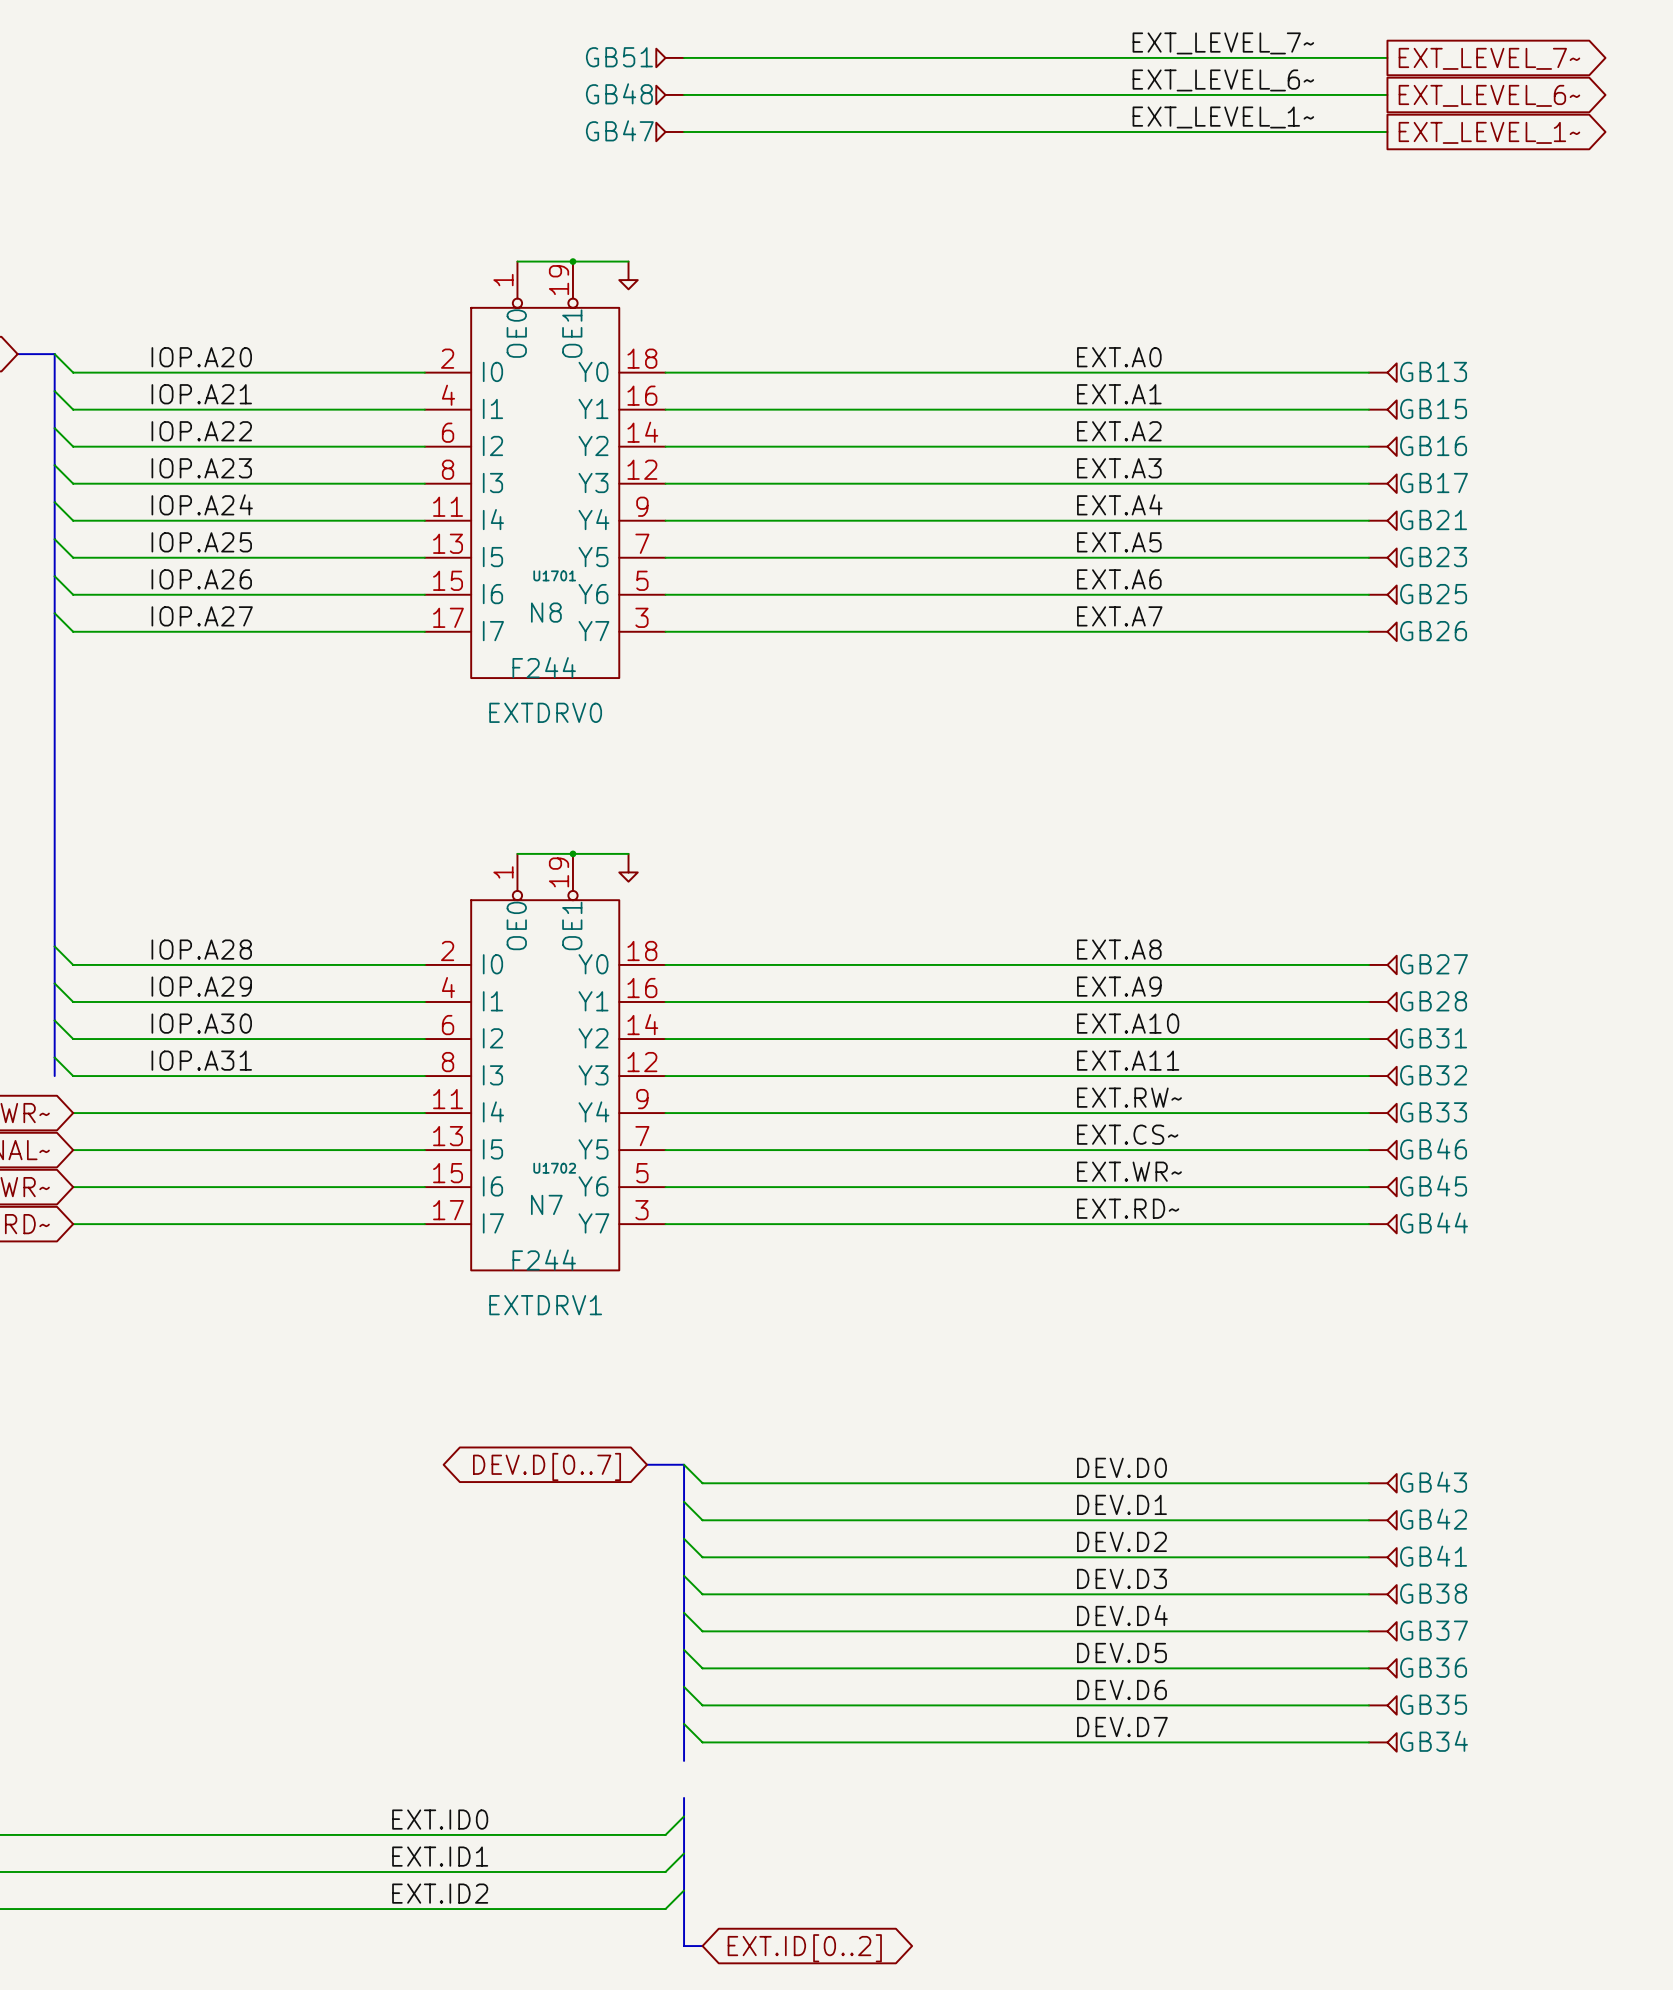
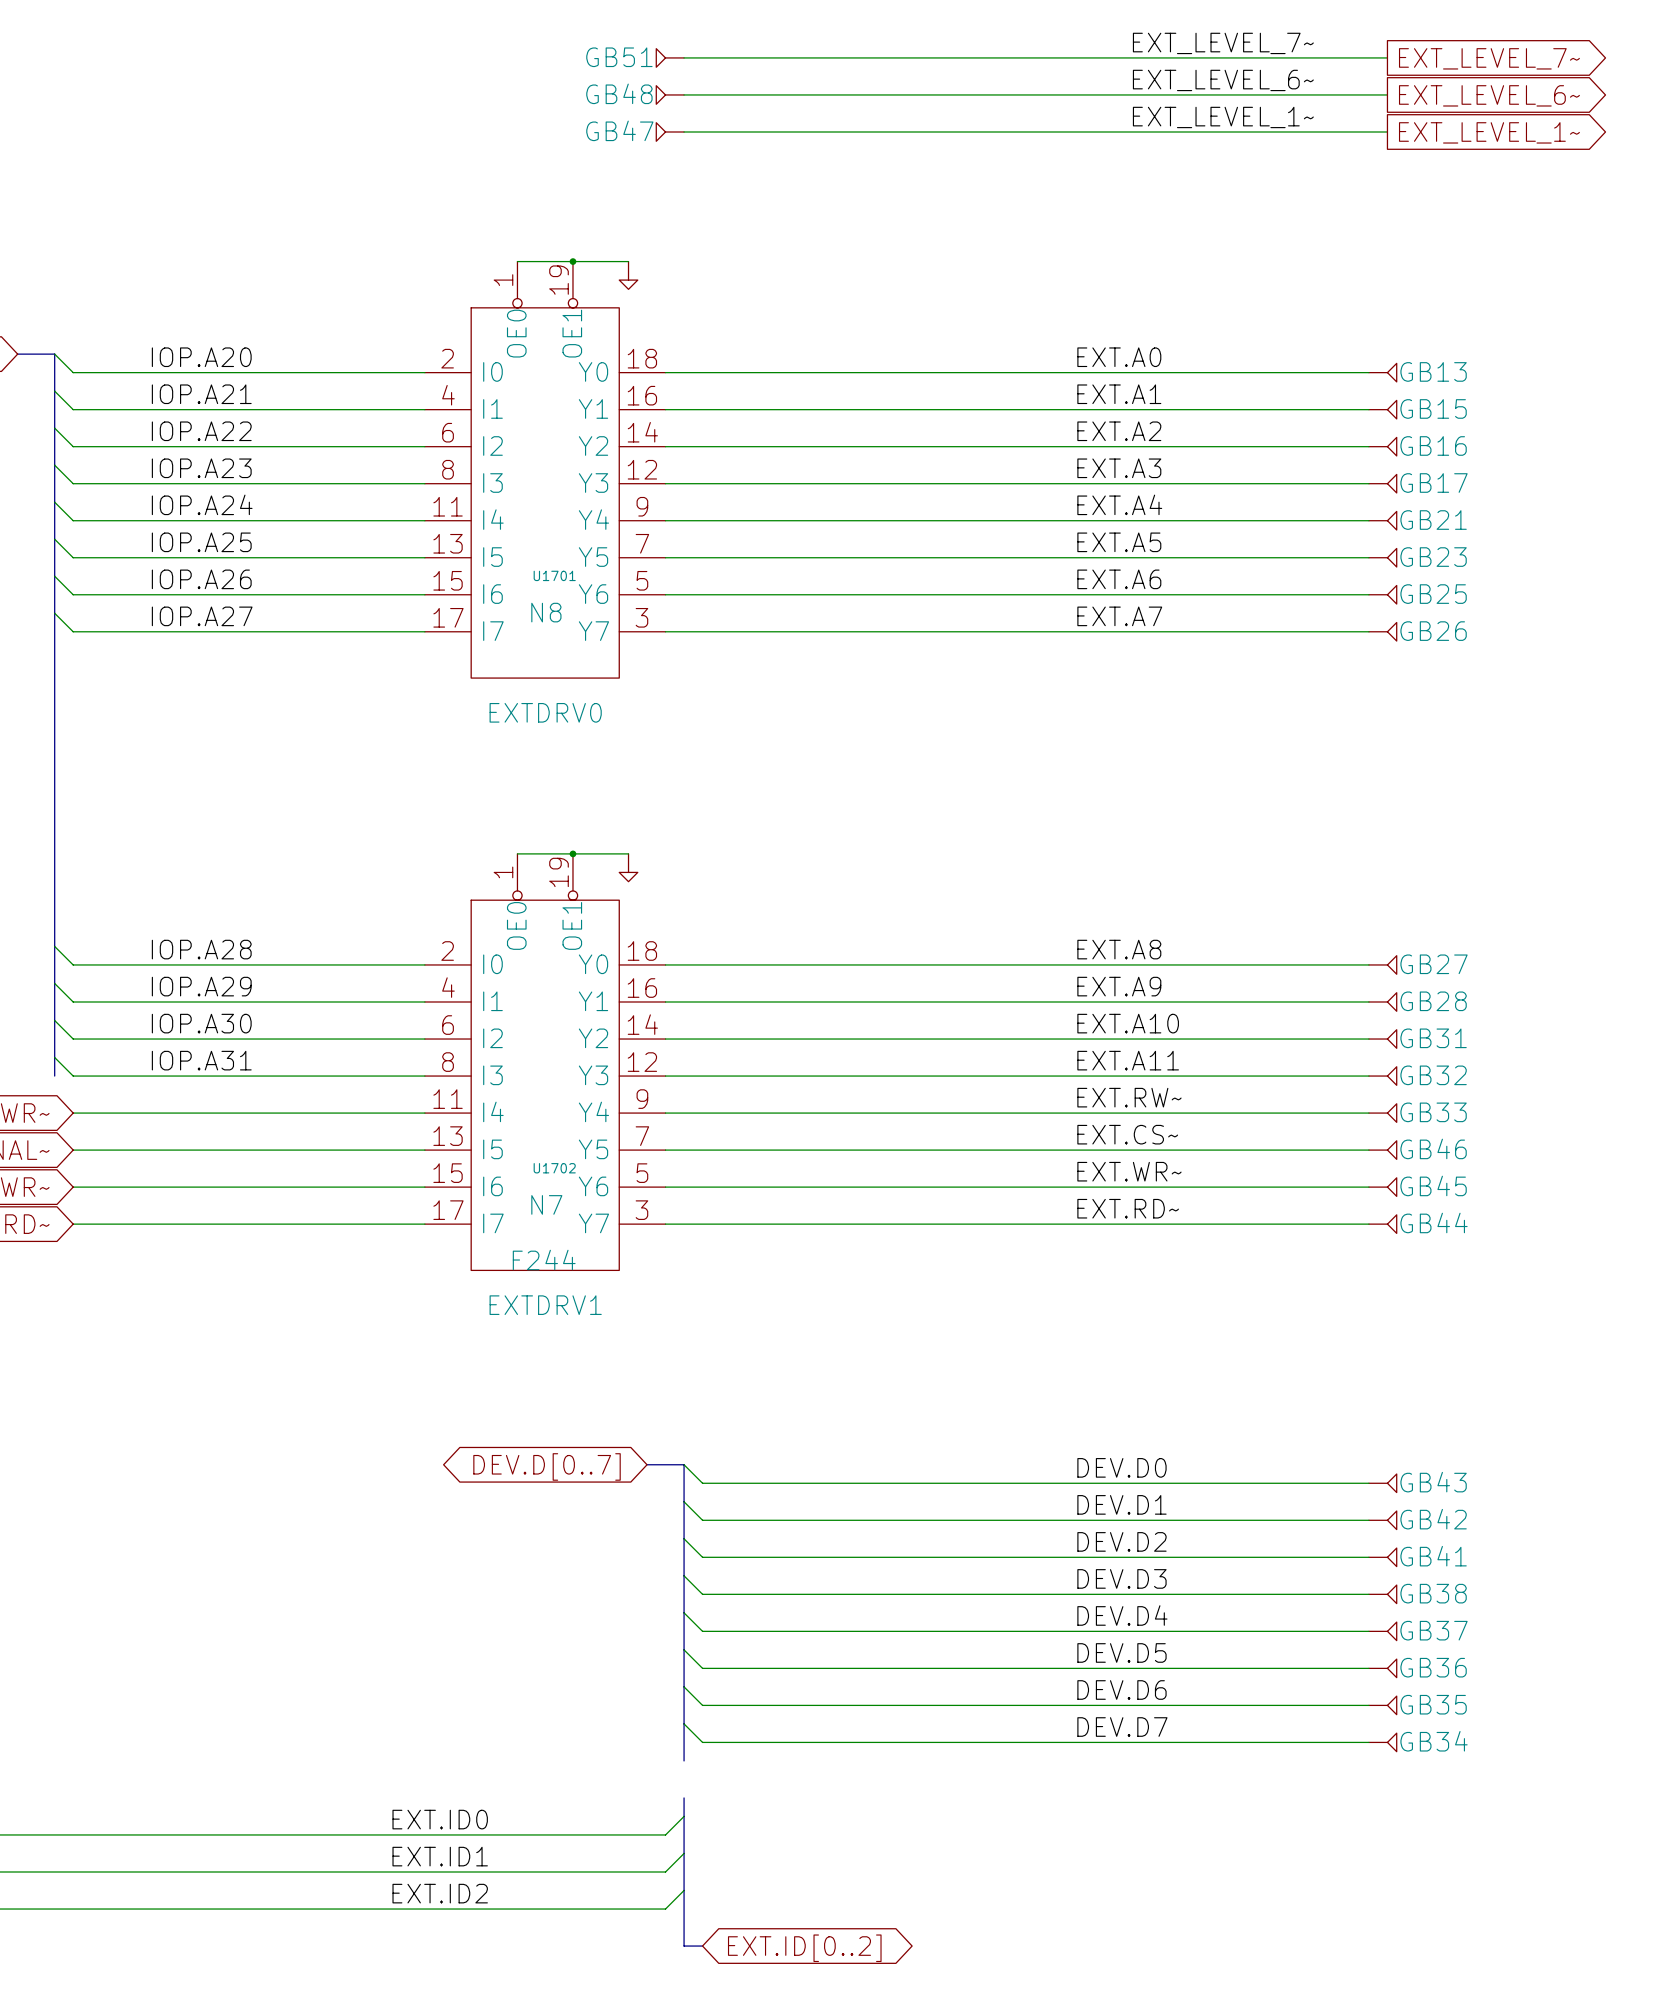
U1701 value: F244 (544, 667) -> none

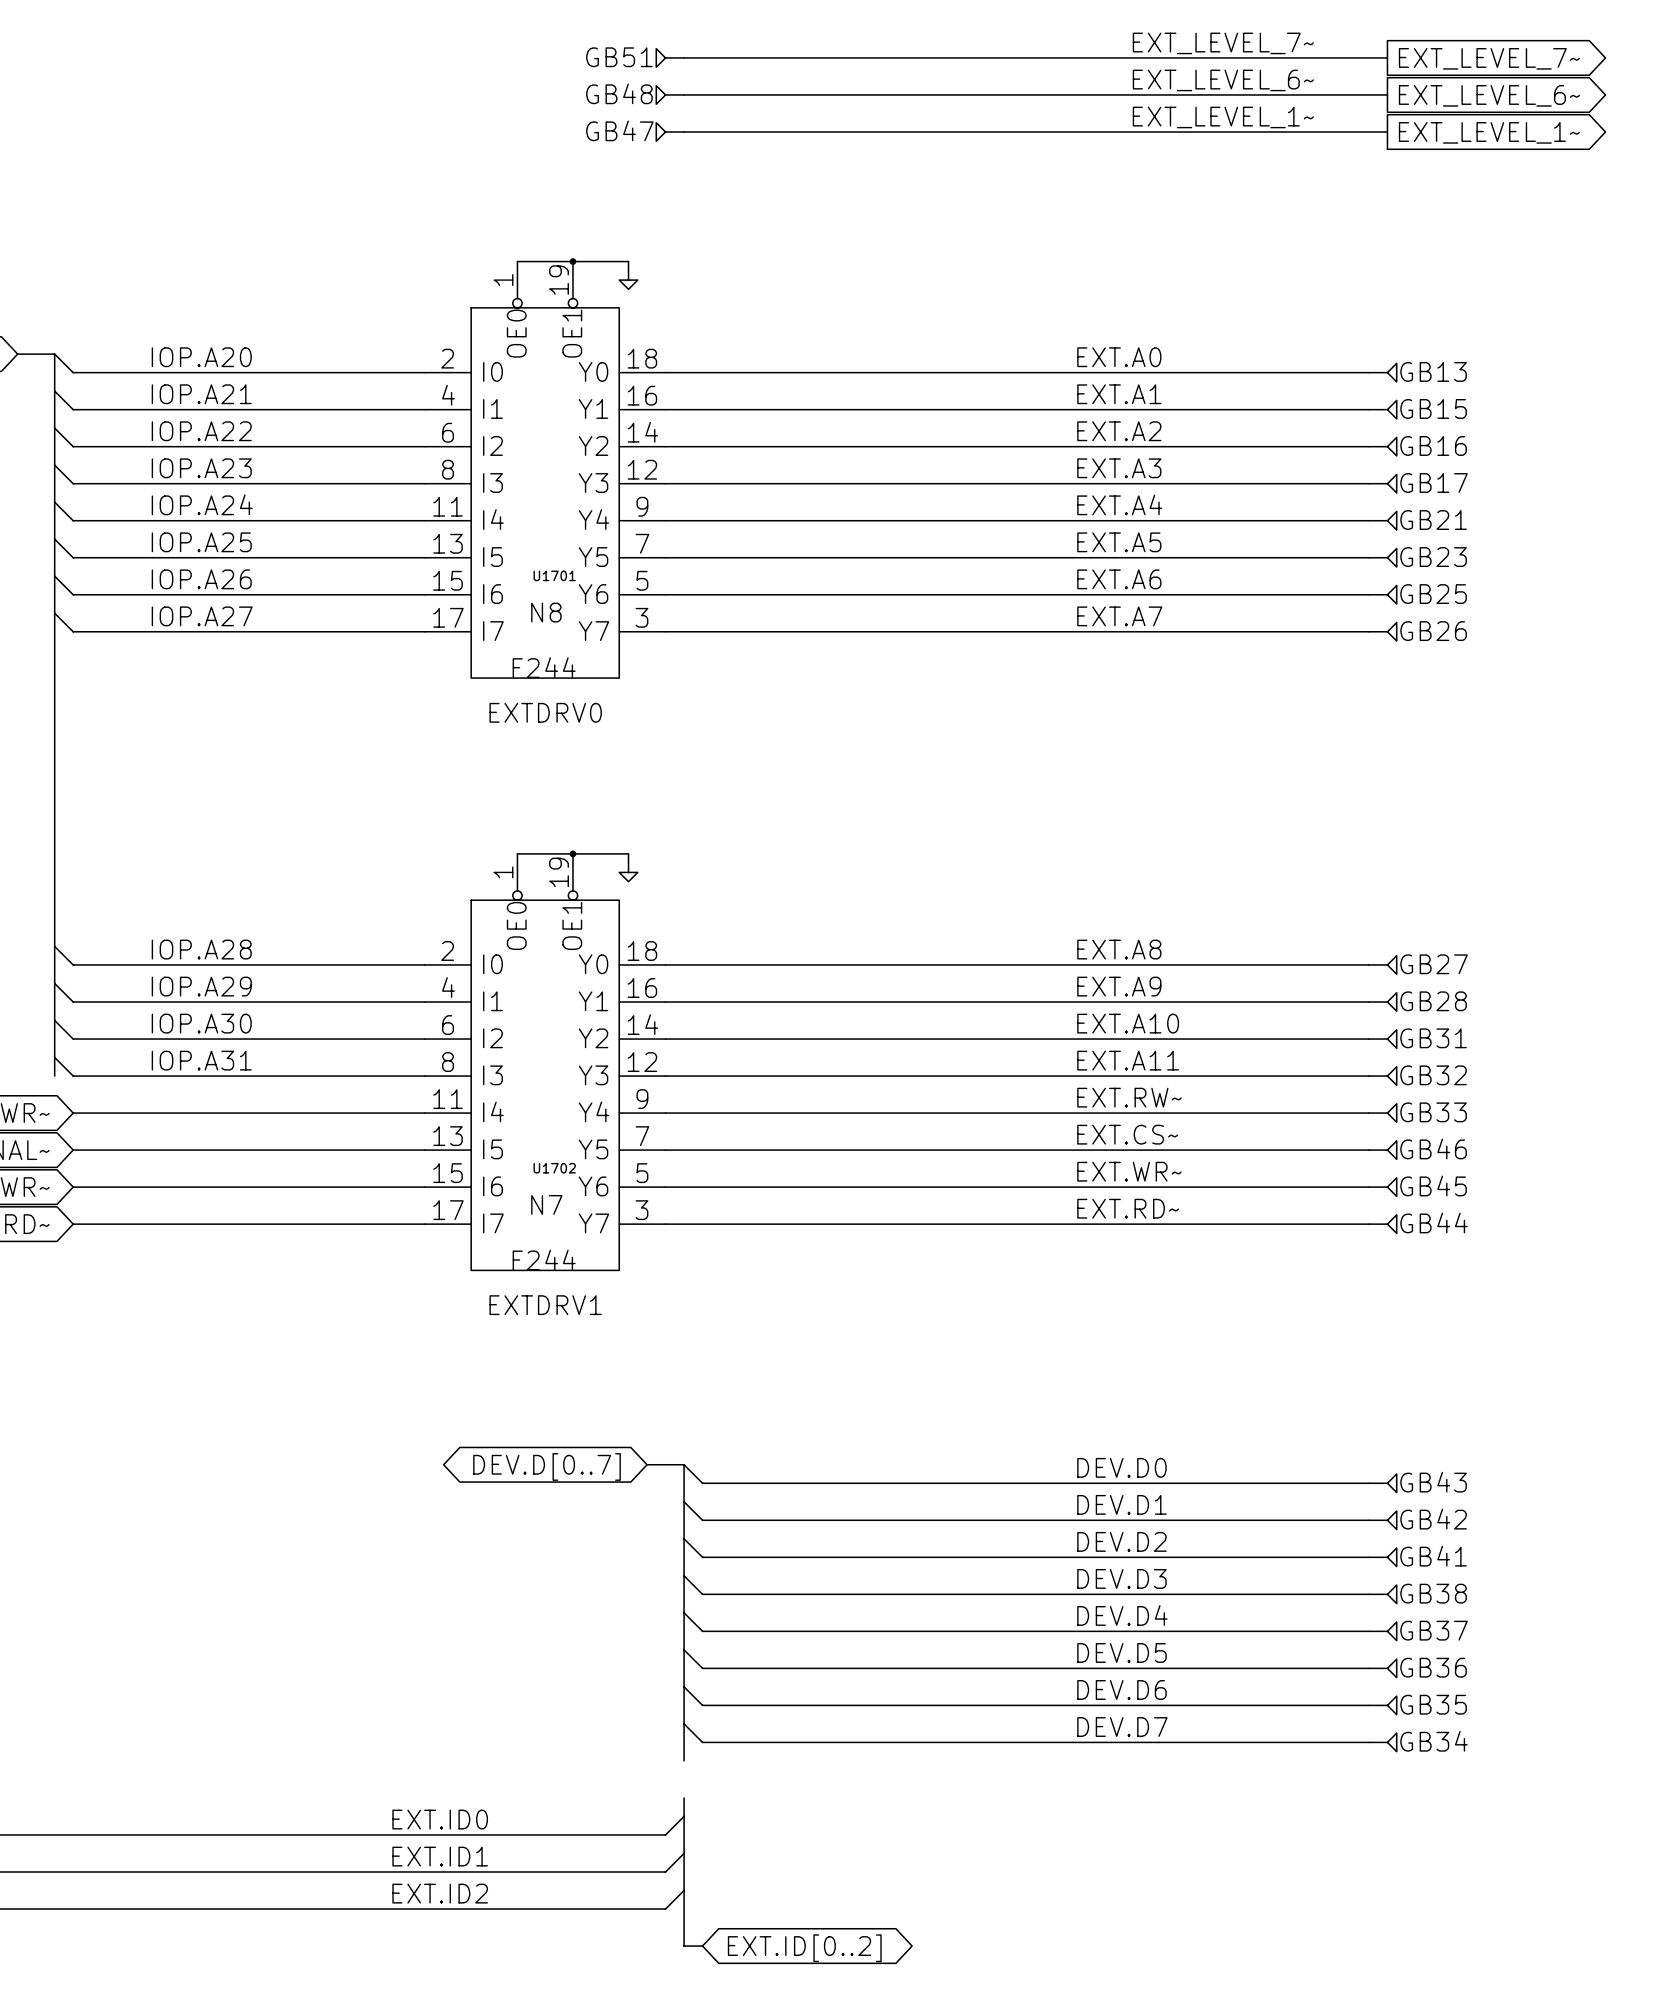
U1701 value: none -> F244 (544, 667)

